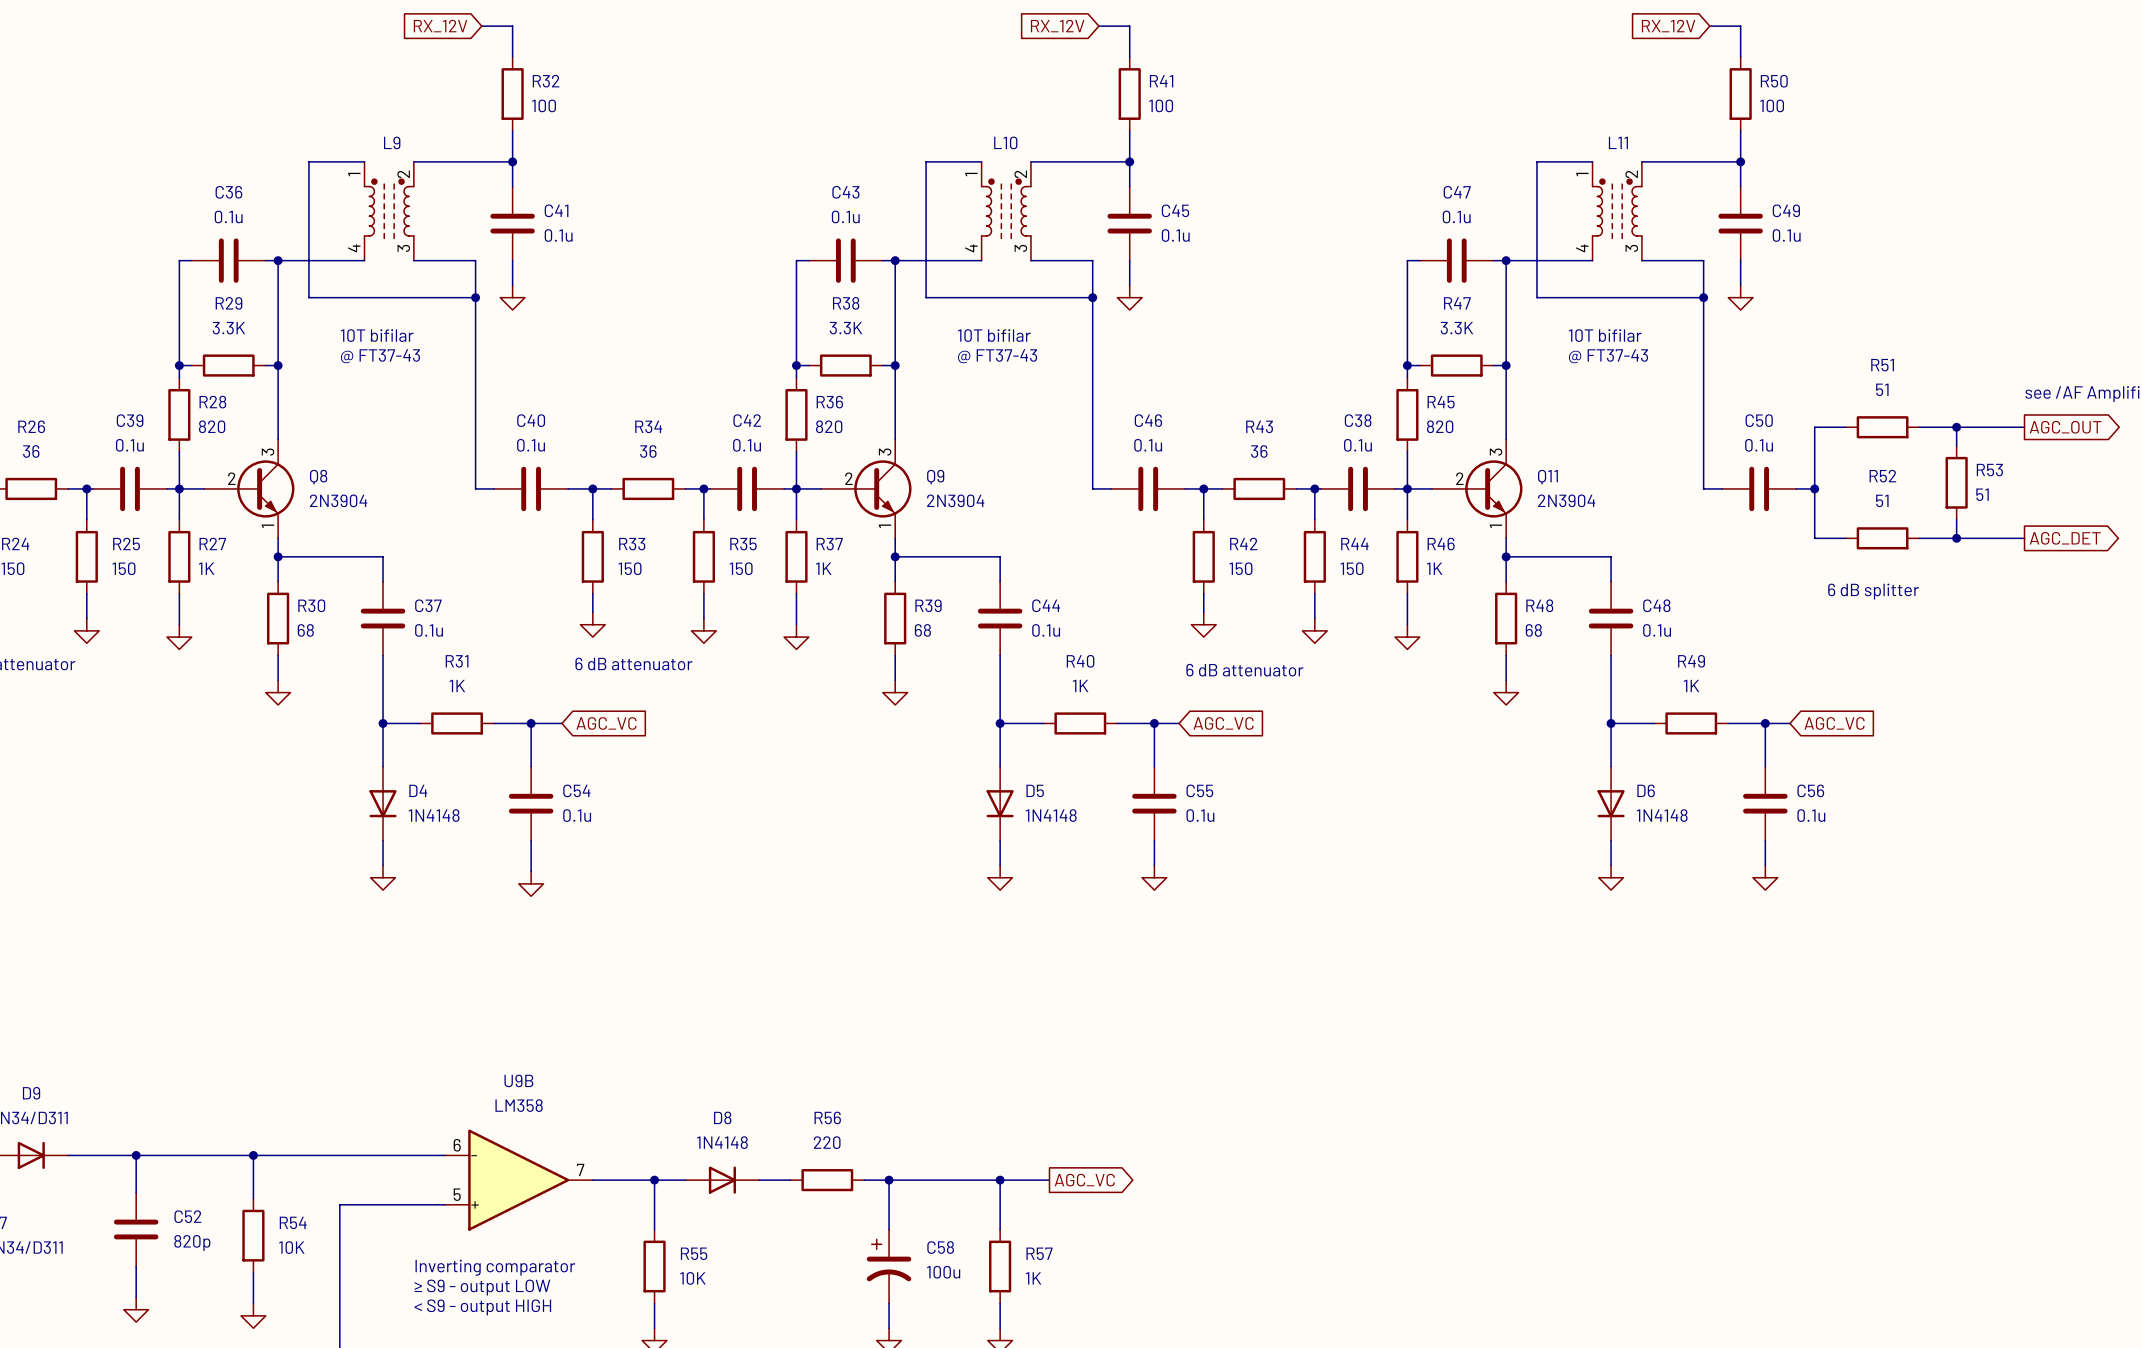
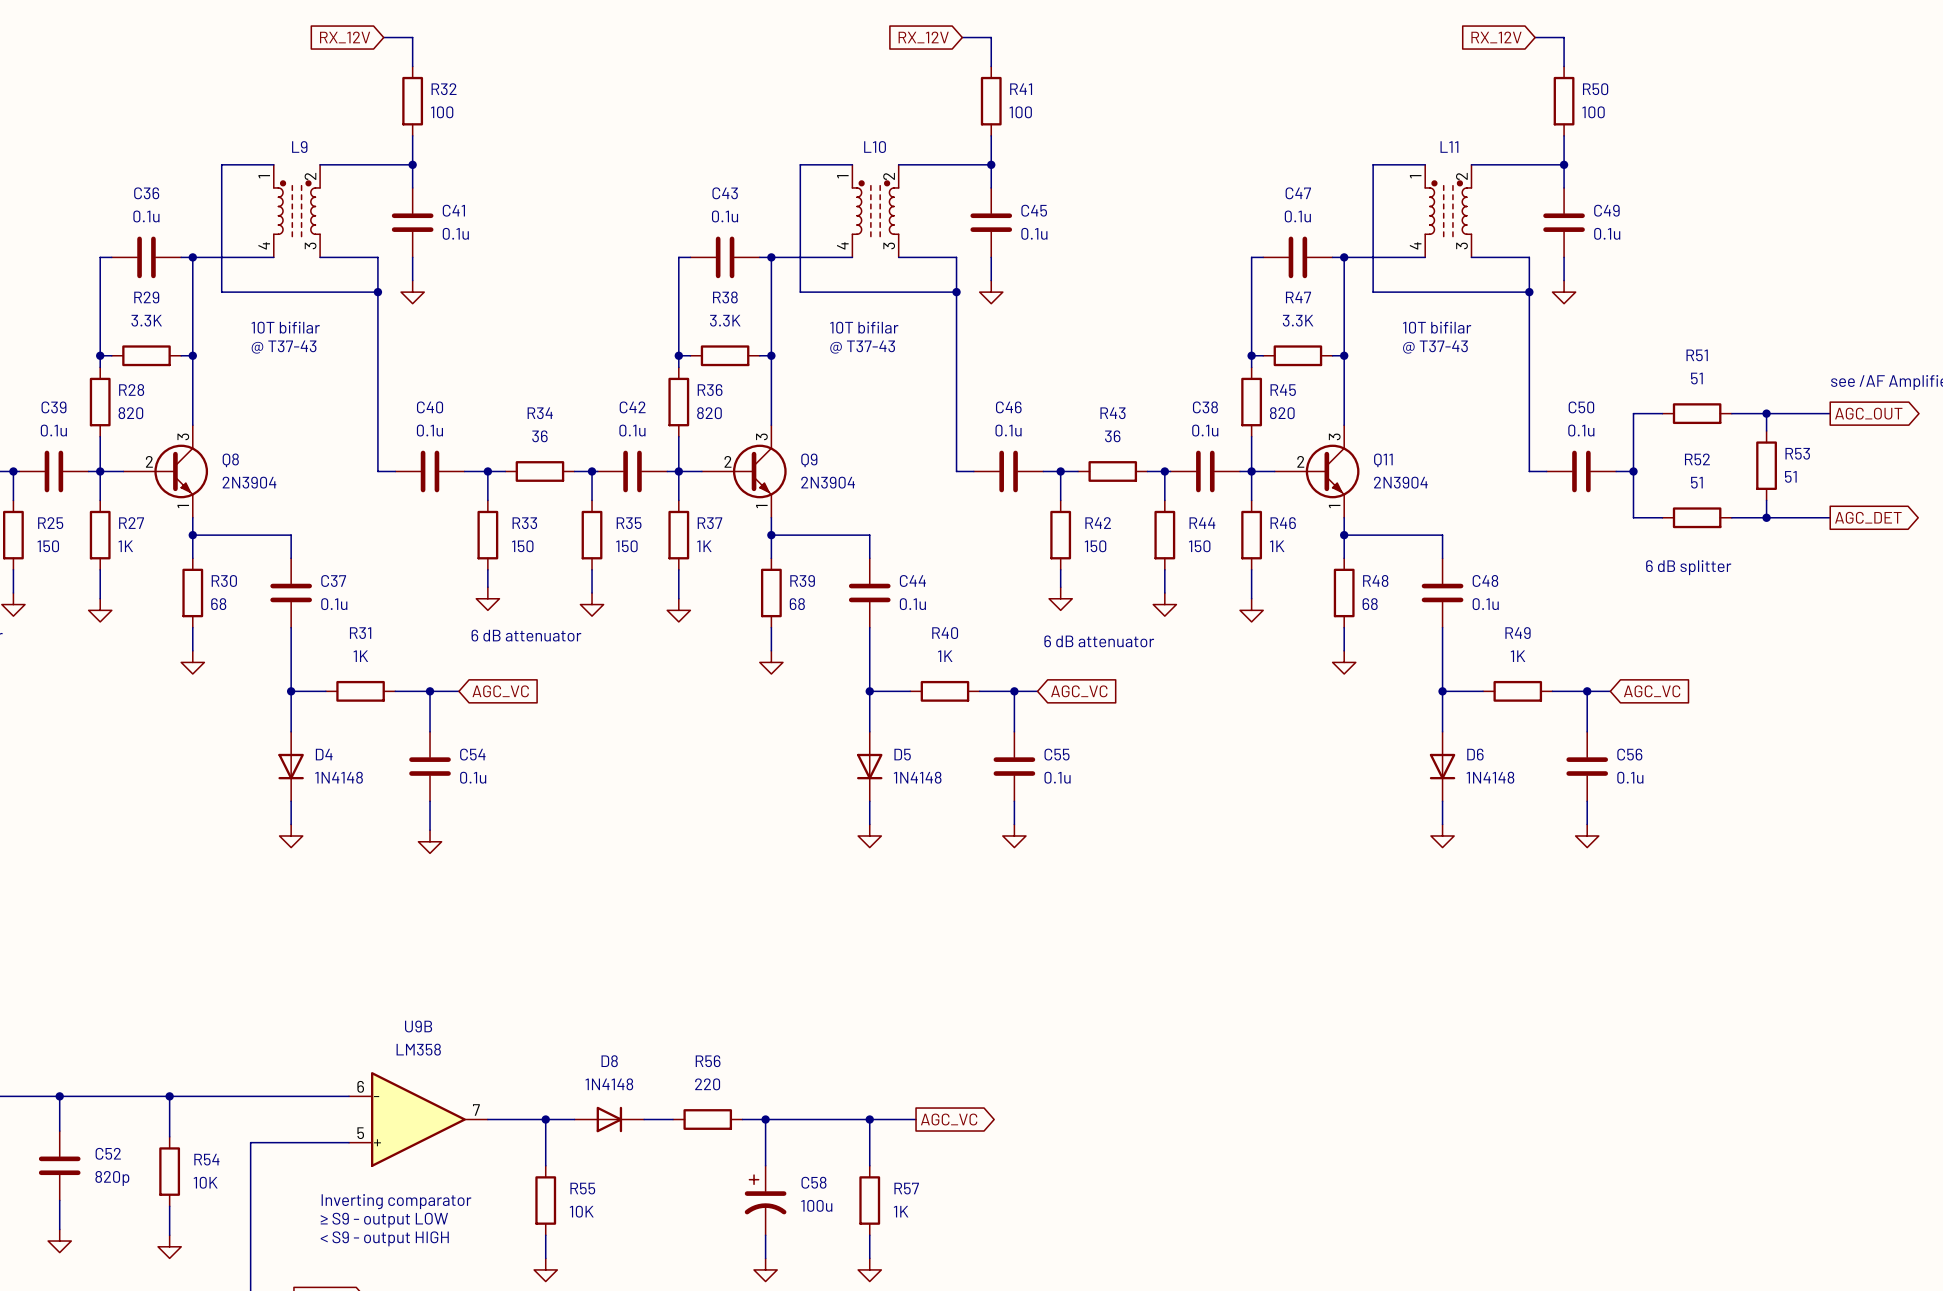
text: @ FT37-43 (380, 356) -> @ T37-43 (284, 347)
text: @ FT37-43 (997, 356) -> @ T37-43 (862, 347)
text: @ FT37-43 (1608, 356) -> @ T37-43 (1435, 347)

